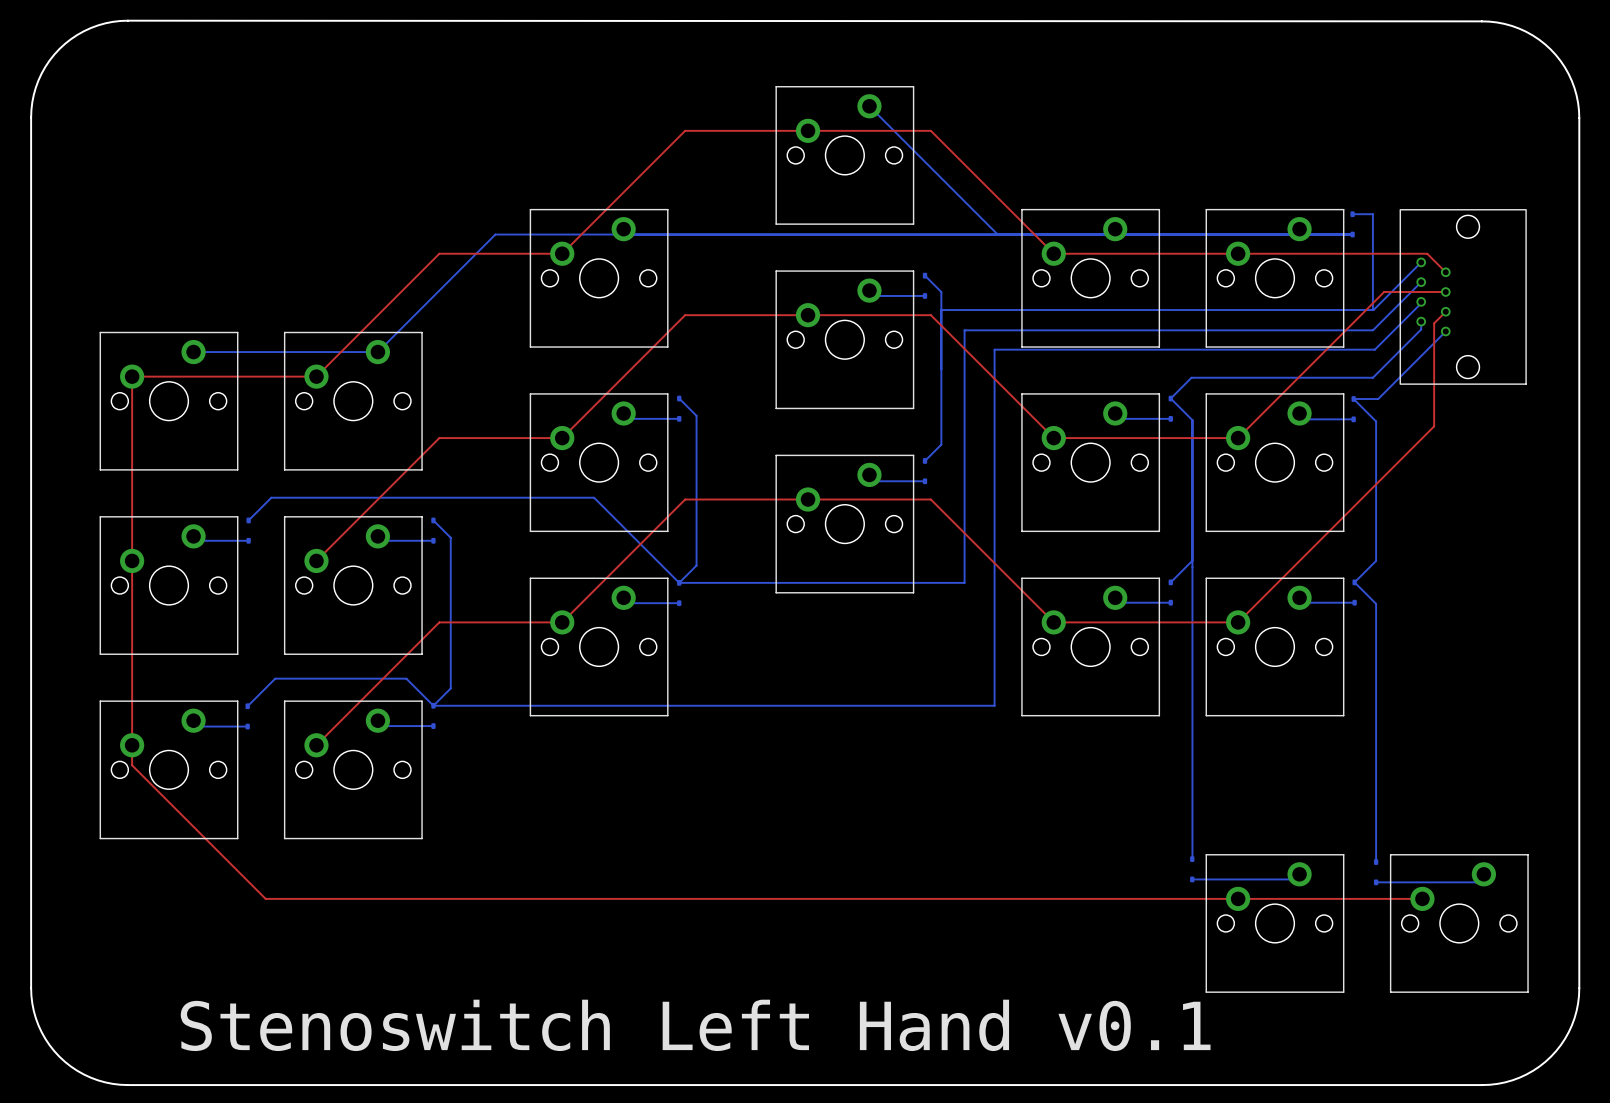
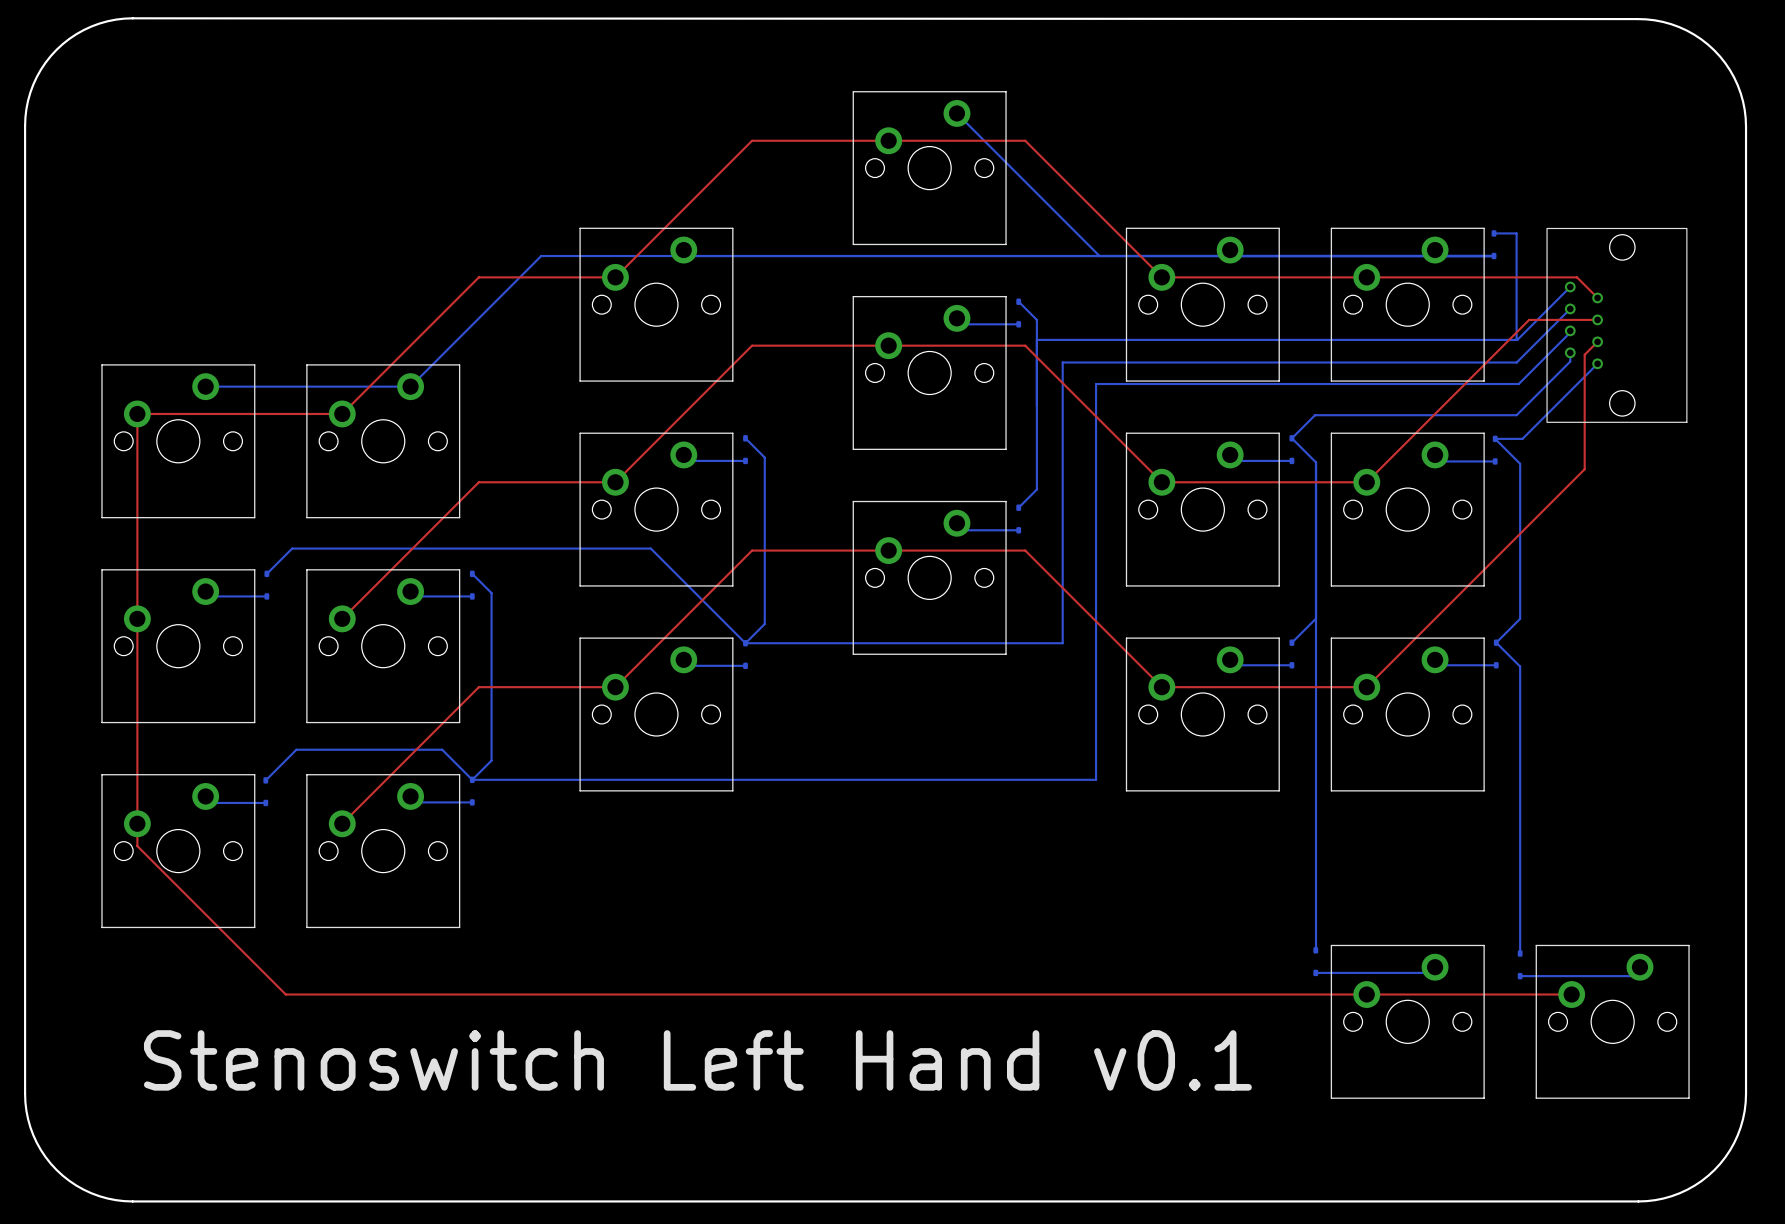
text position: Stenoswitch Left Hand v0.1 (695, 1025) -> Stenoswitch Left Hand v0.1 (697, 1060)

